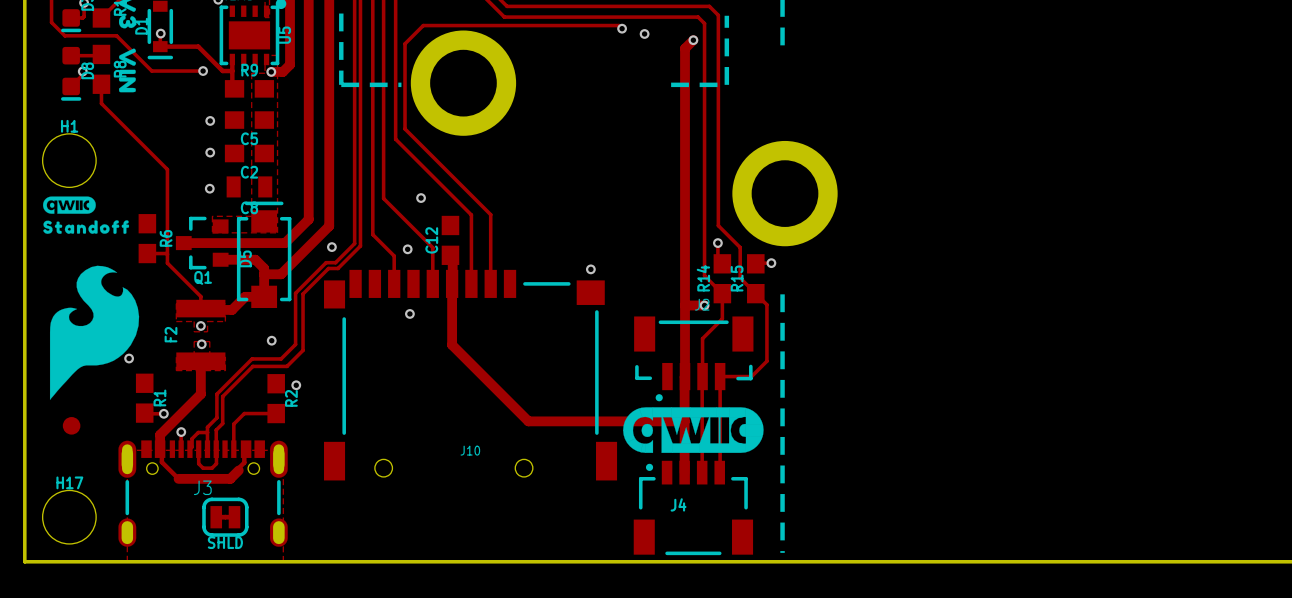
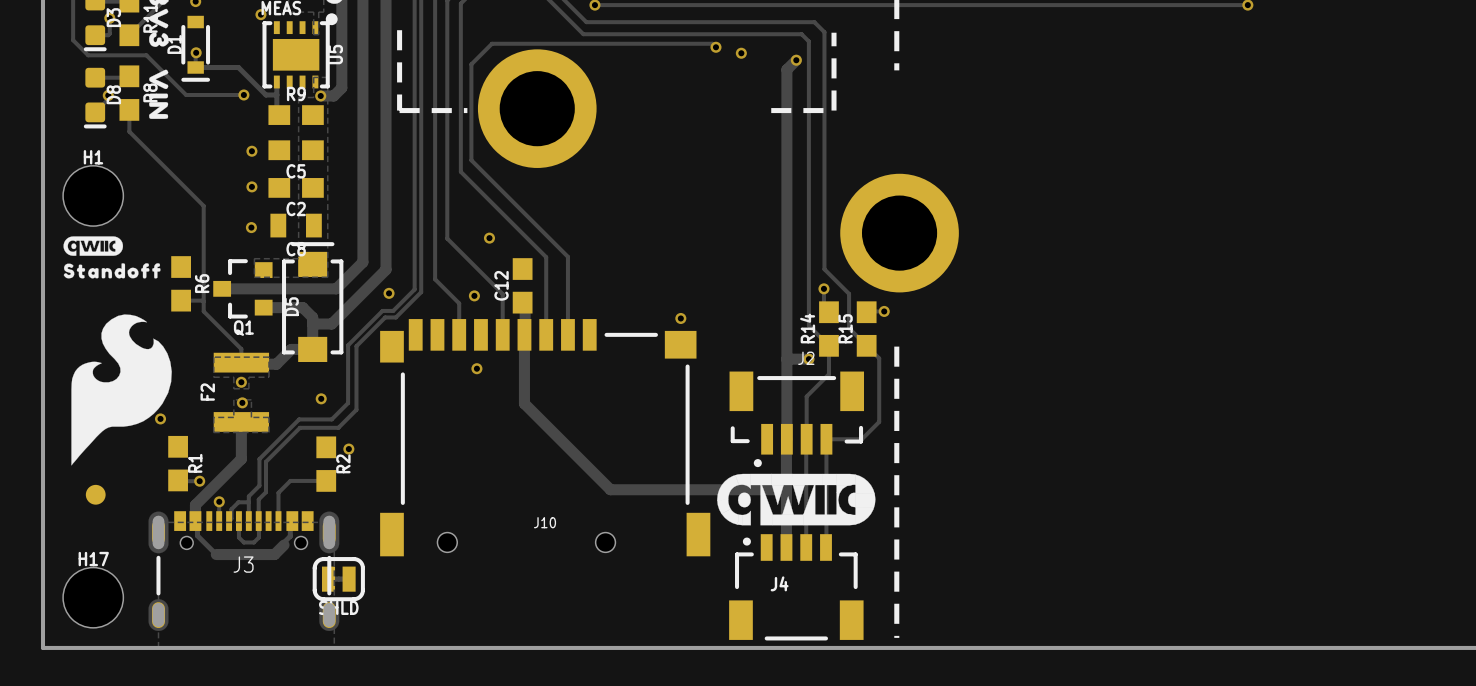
SHLD position: (225, 517) -> (338, 579)

